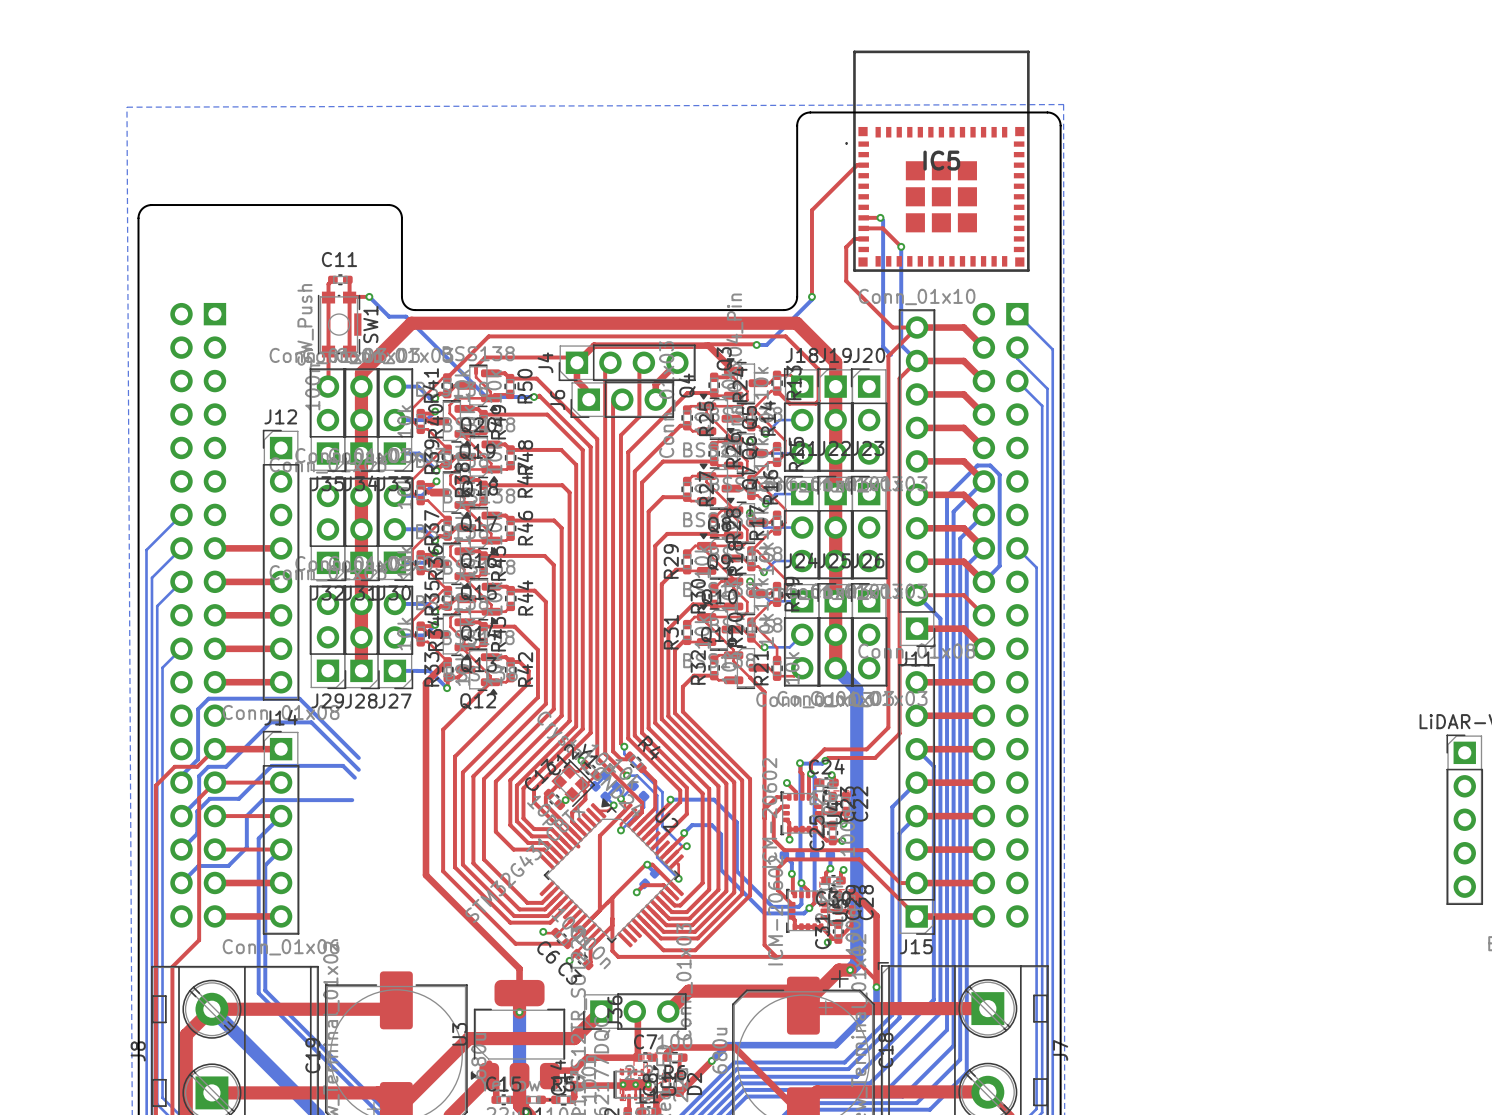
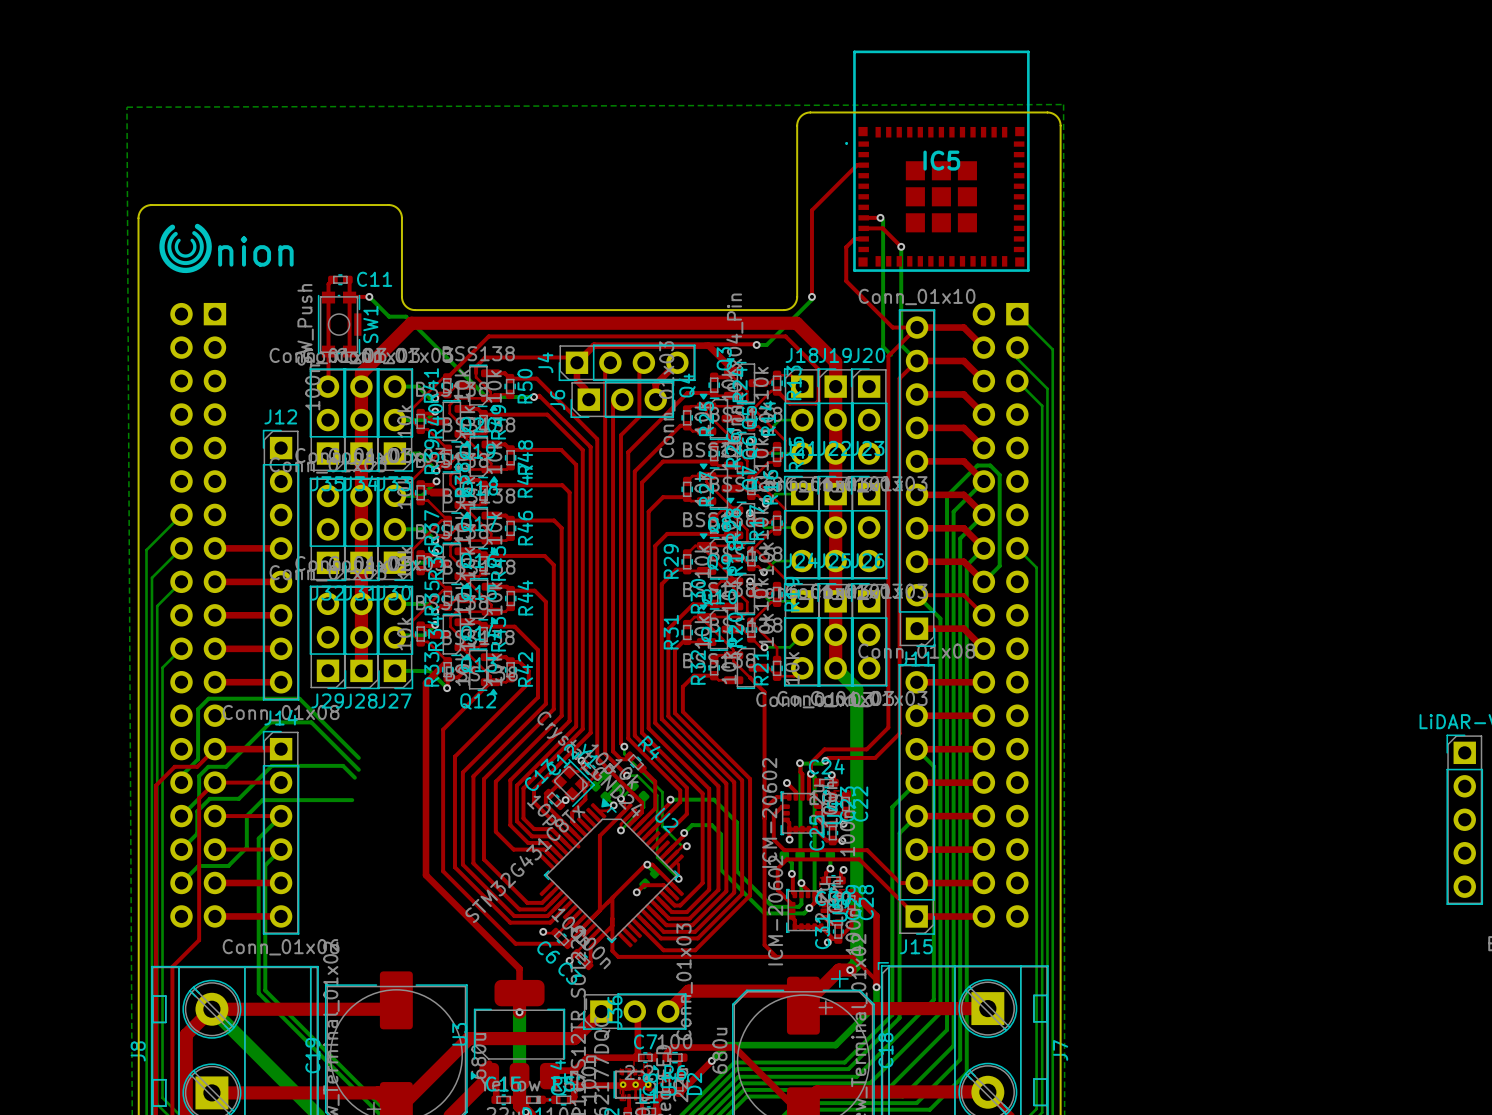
line: none -> (197, 226) (207, 237) (208, 252) (200, 265) (186, 270) (171, 266) (163, 254) (163, 239) (172, 227)
line: none -> (194, 233) (200, 240) (201, 250) (195, 259) (186, 263) (176, 260) (170, 252) (170, 242) (175, 233)
line: none -> (179, 240) (176, 244) (177, 250) (179, 254) (185, 256) (191, 254) (194, 250) (194, 244) (192, 240)
text: none -> nion (255, 251)
C11 name position: C11 (339, 259) -> C11 (374, 279)

